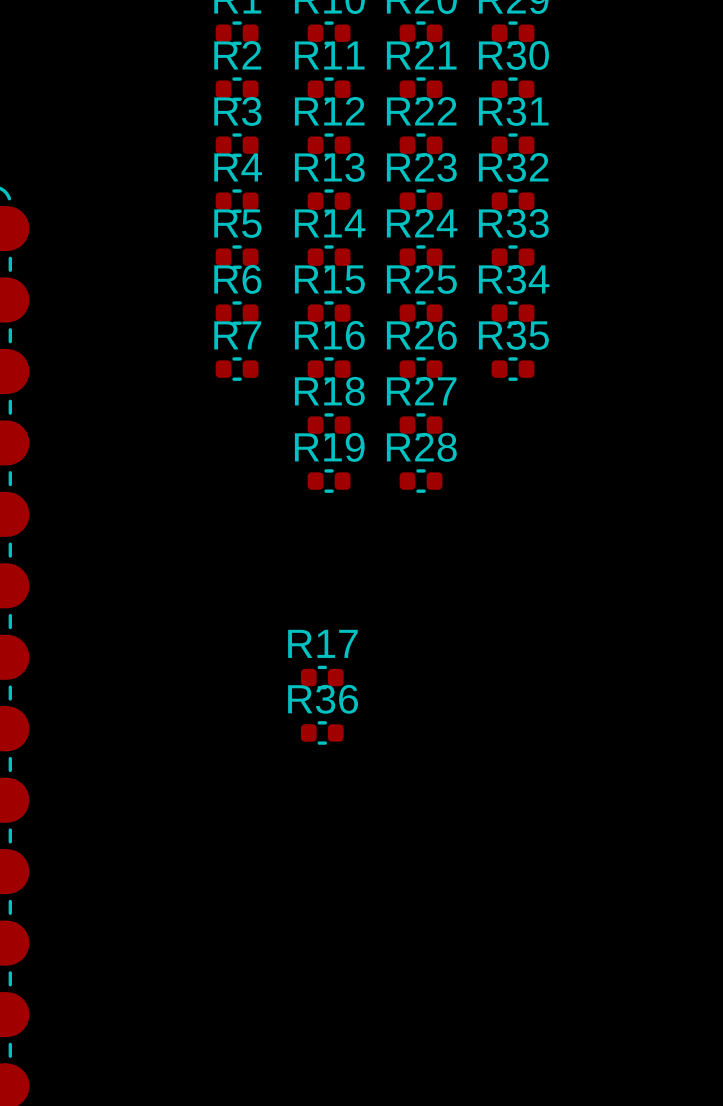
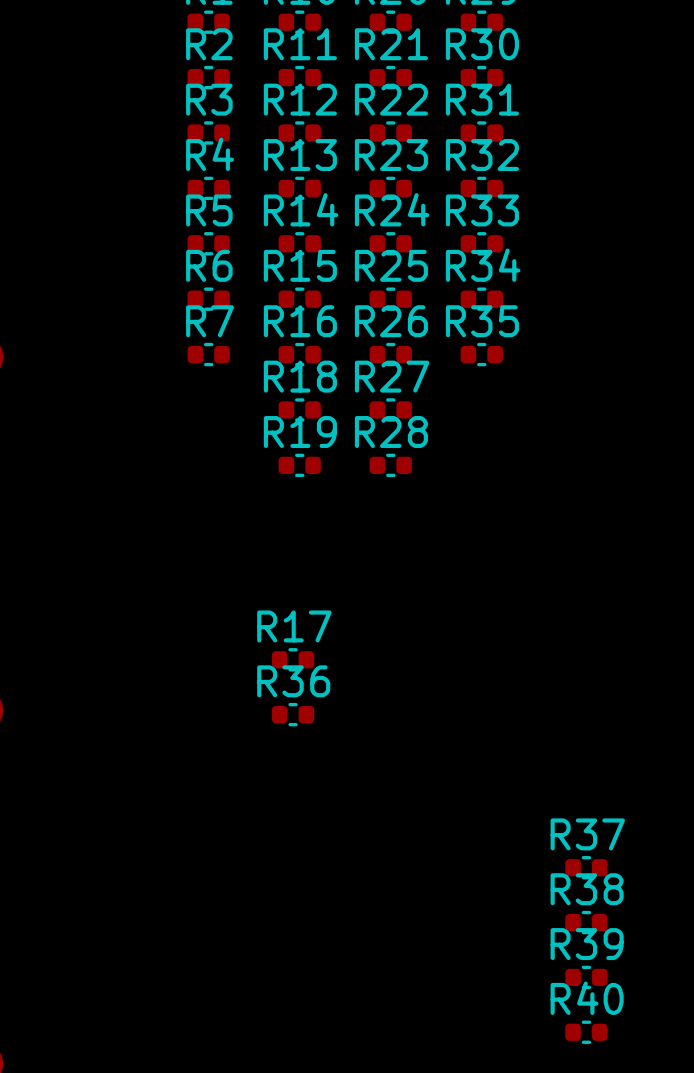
R37: none -> (586, 867)
R38: none -> (586, 922)
R39: none -> (586, 977)
R40: none -> (586, 1032)

